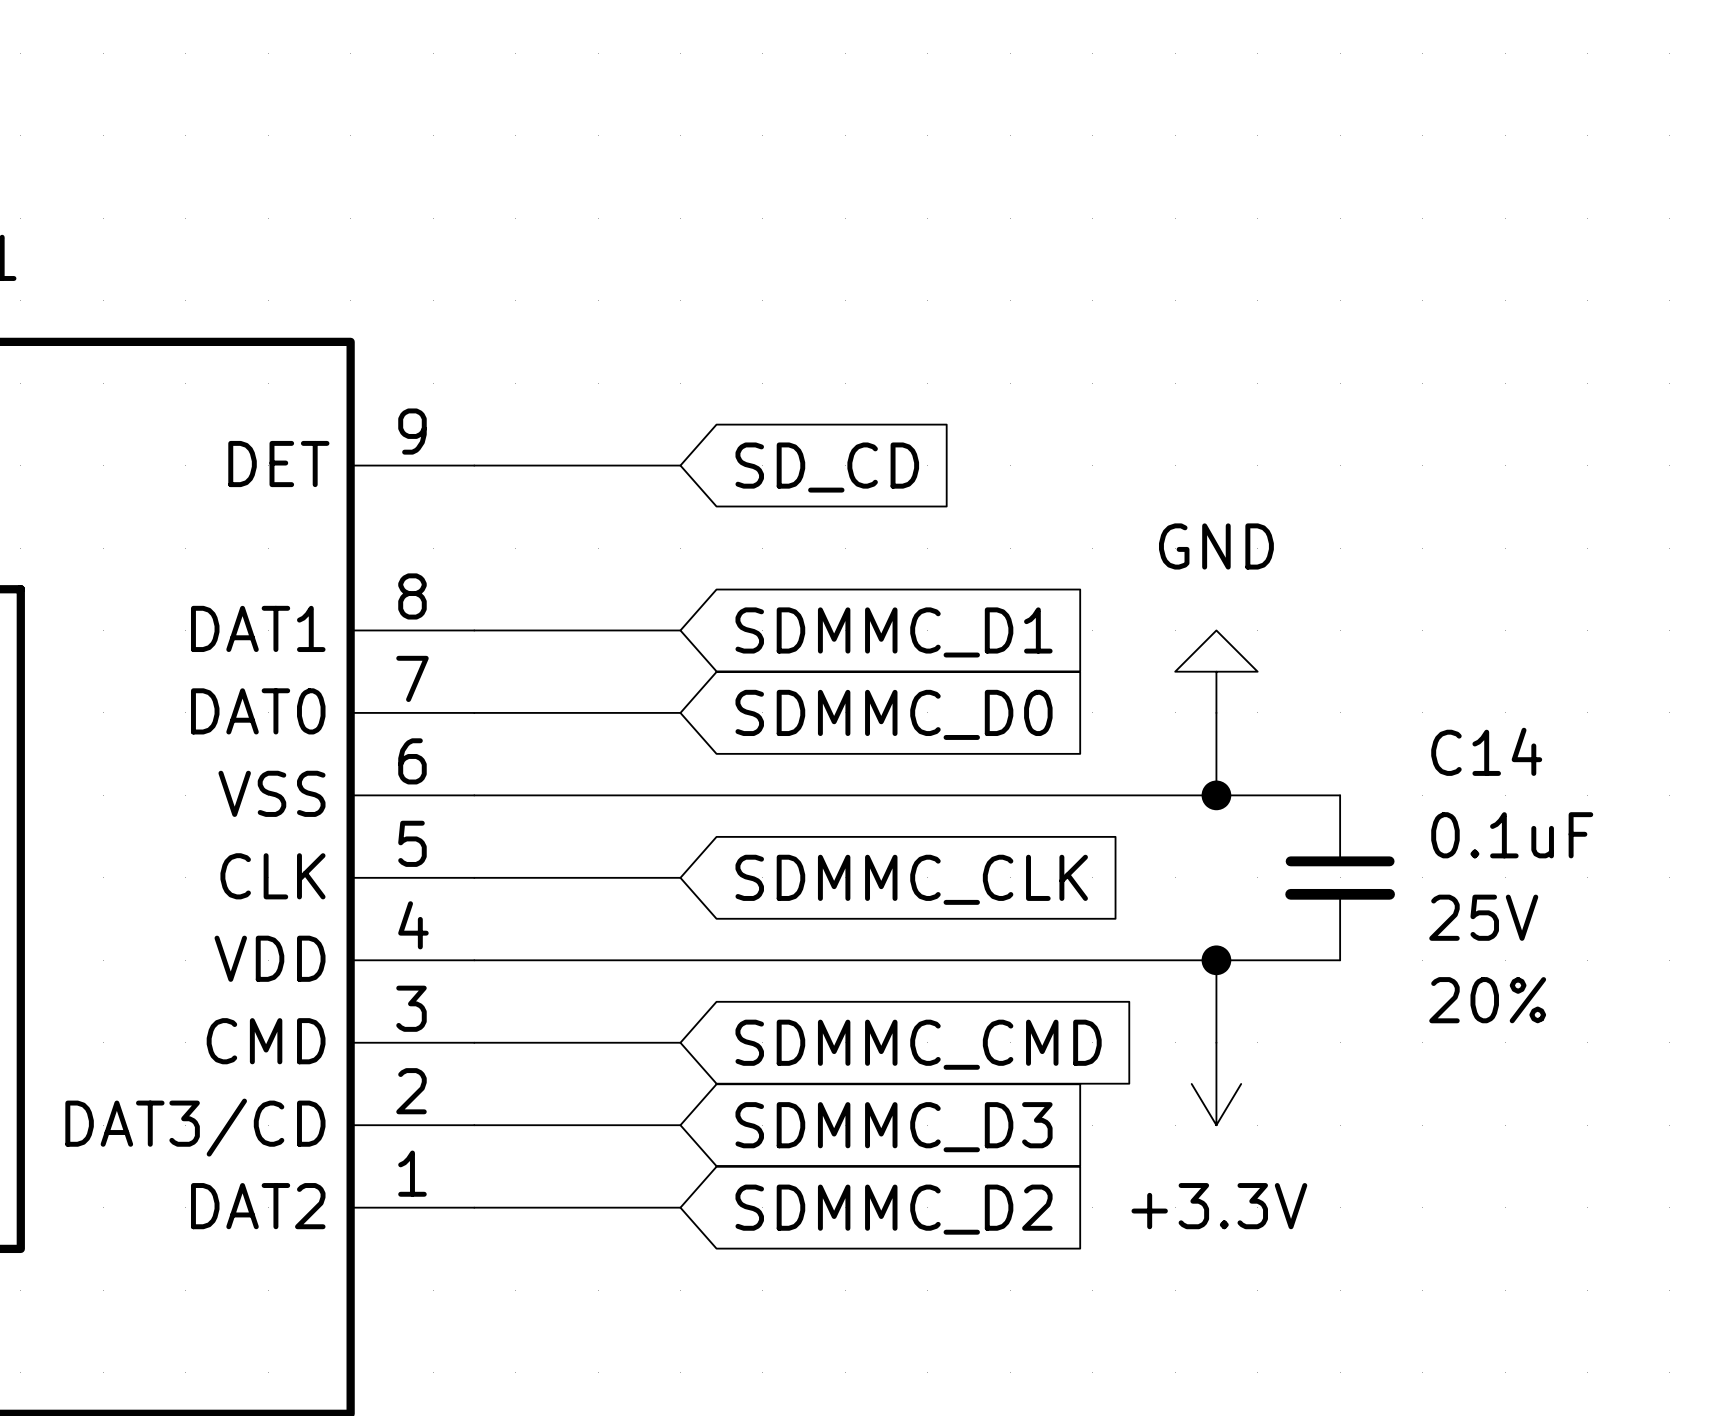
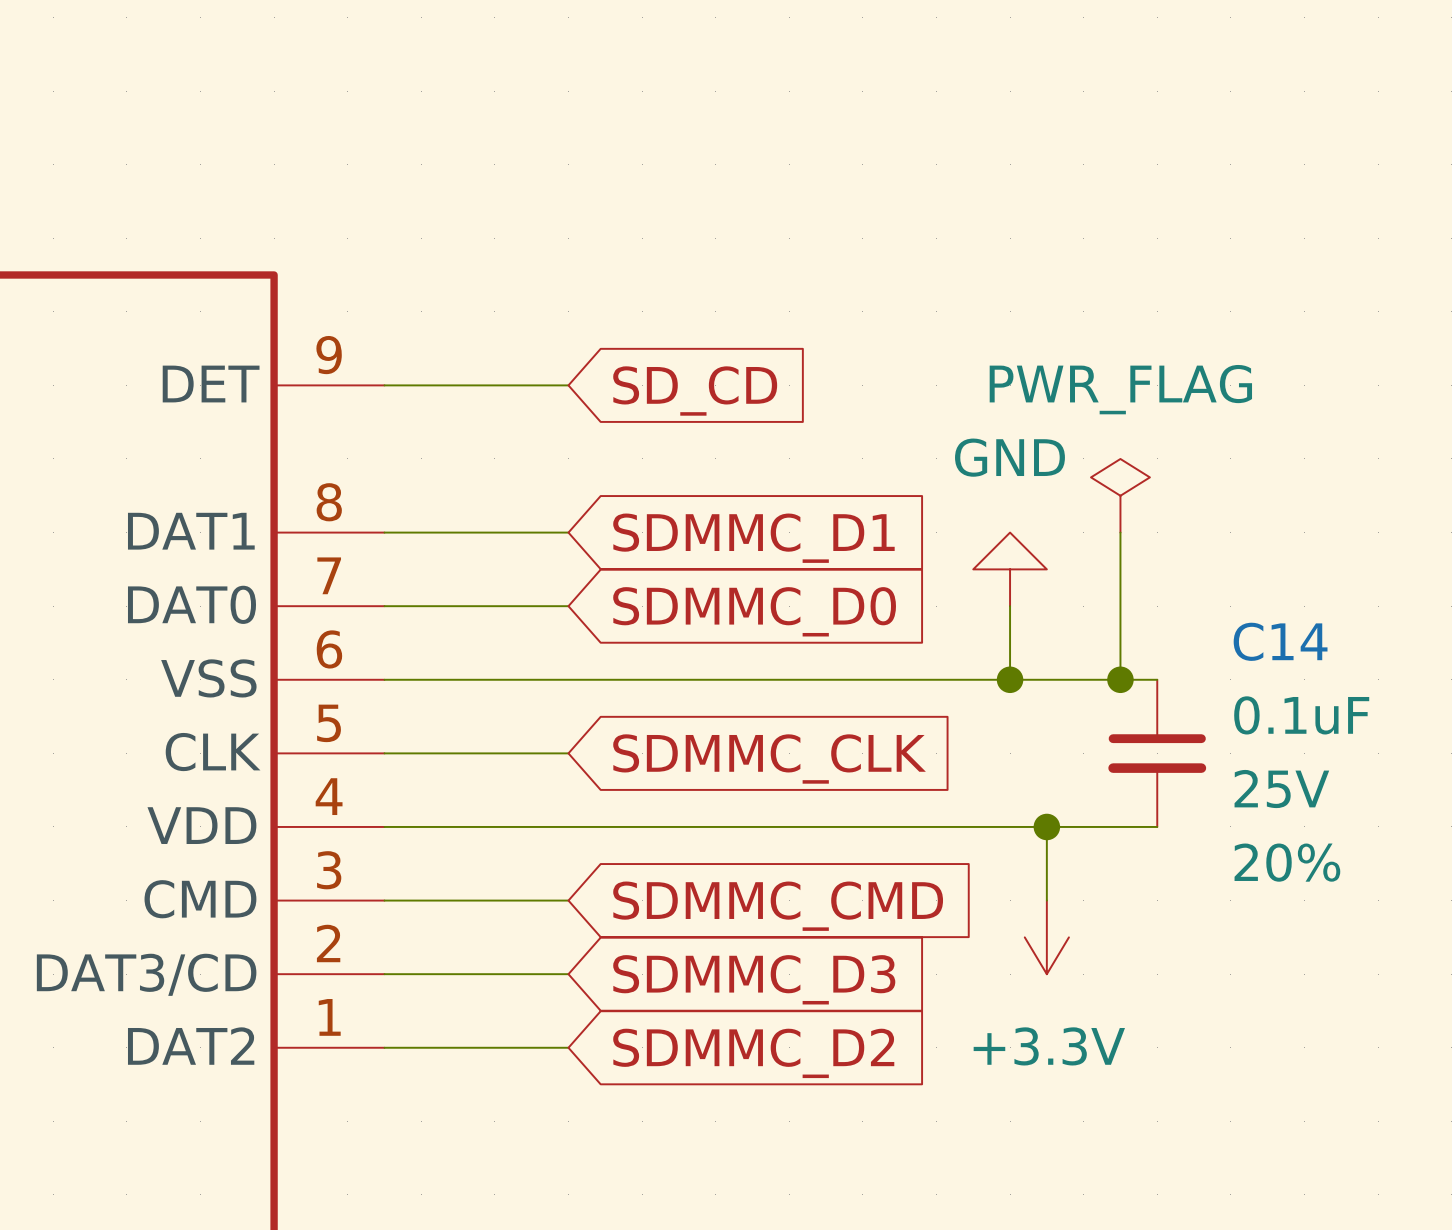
power symbol: none -> PWR_FLAG (1120, 495)
wire: none -> (1120, 532) (1120, 679)
power symbol position: GND (1216, 671) -> GND (1010, 569)
wire: (1216, 712) (1216, 795) -> (1010, 606) (1010, 679)
junction: none -> (1010, 679)
junction: (1216, 795) -> none
junction: none -> (1120, 679)

